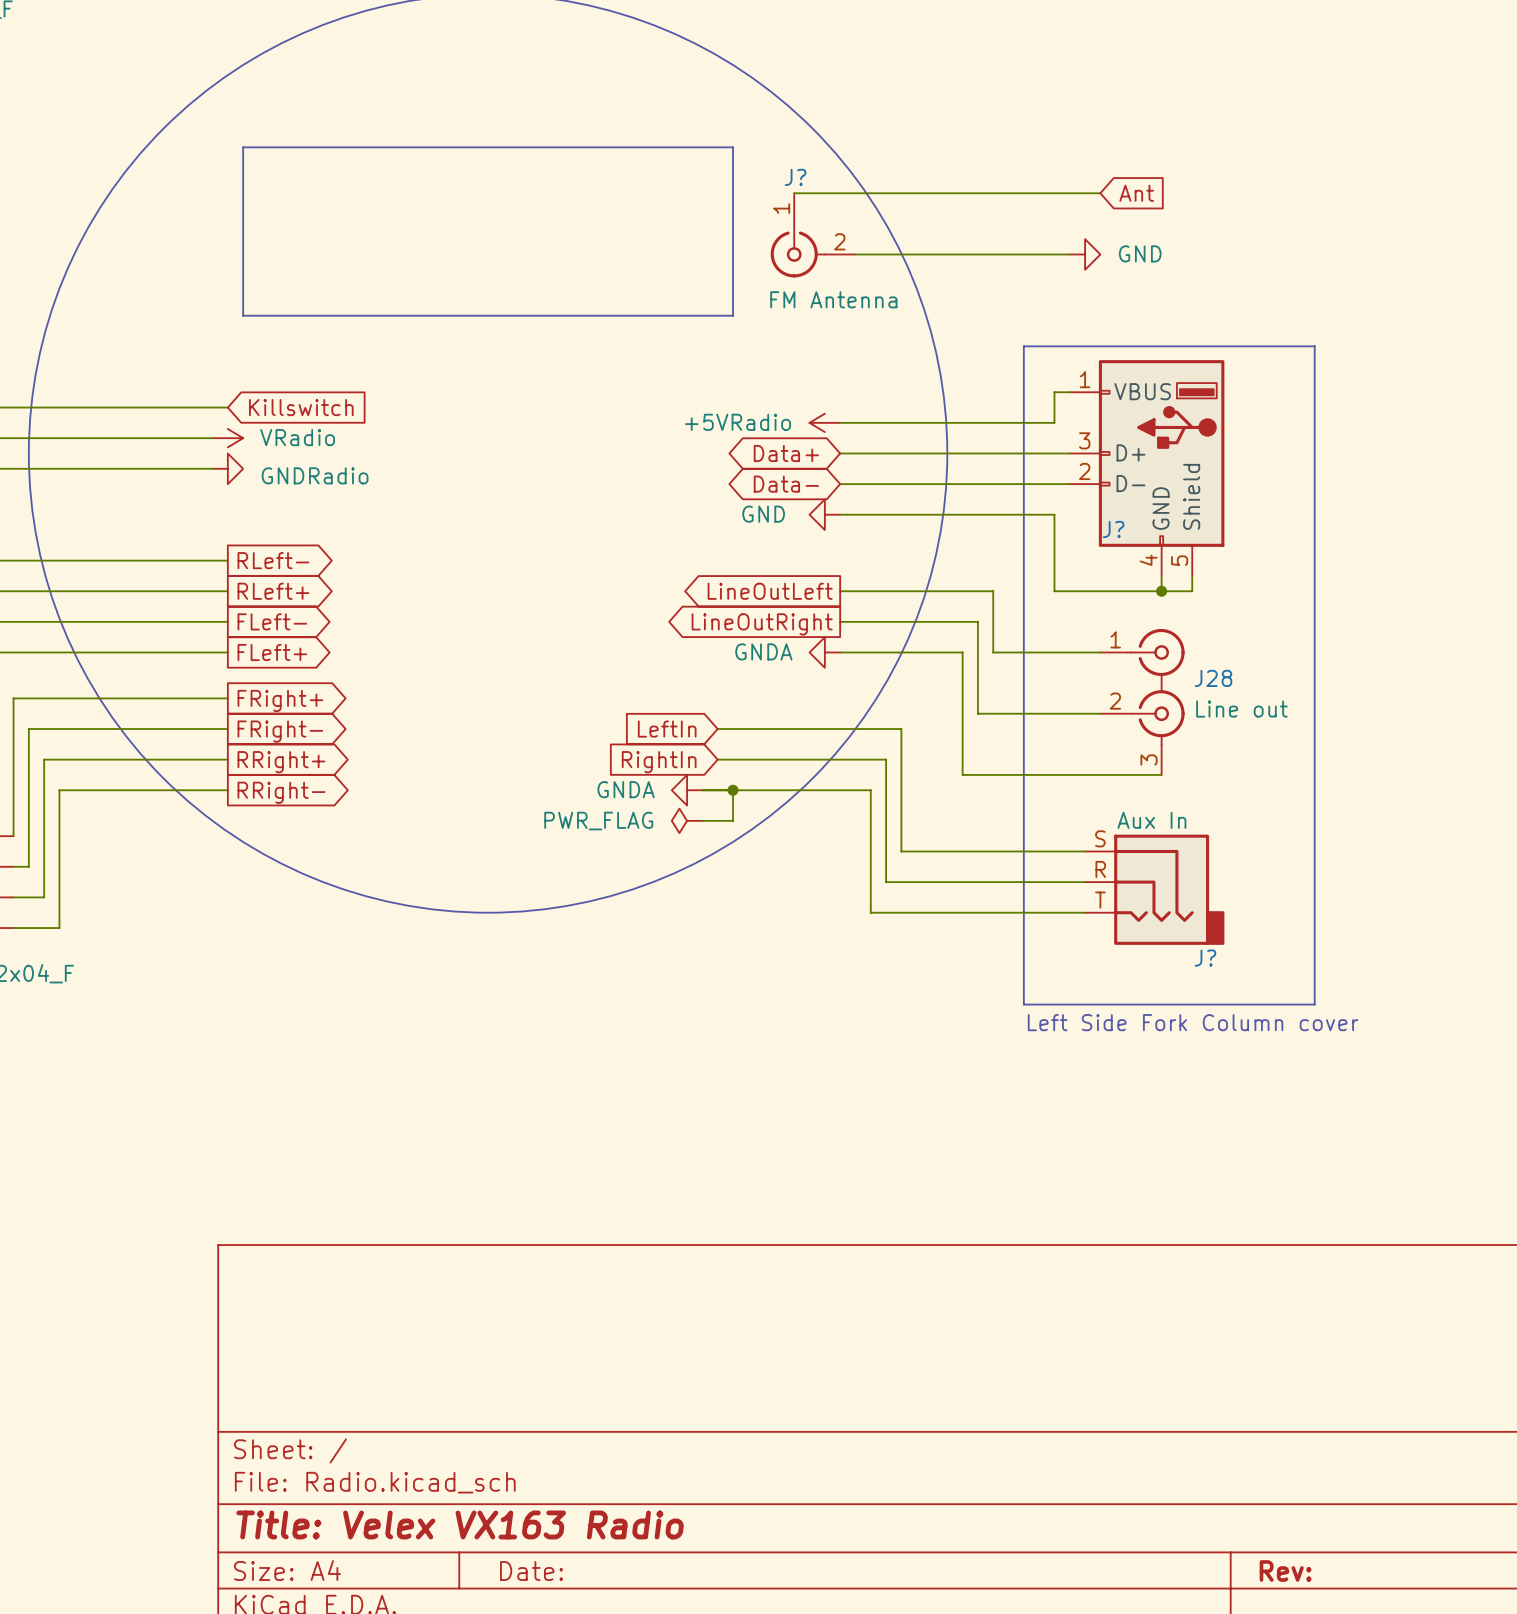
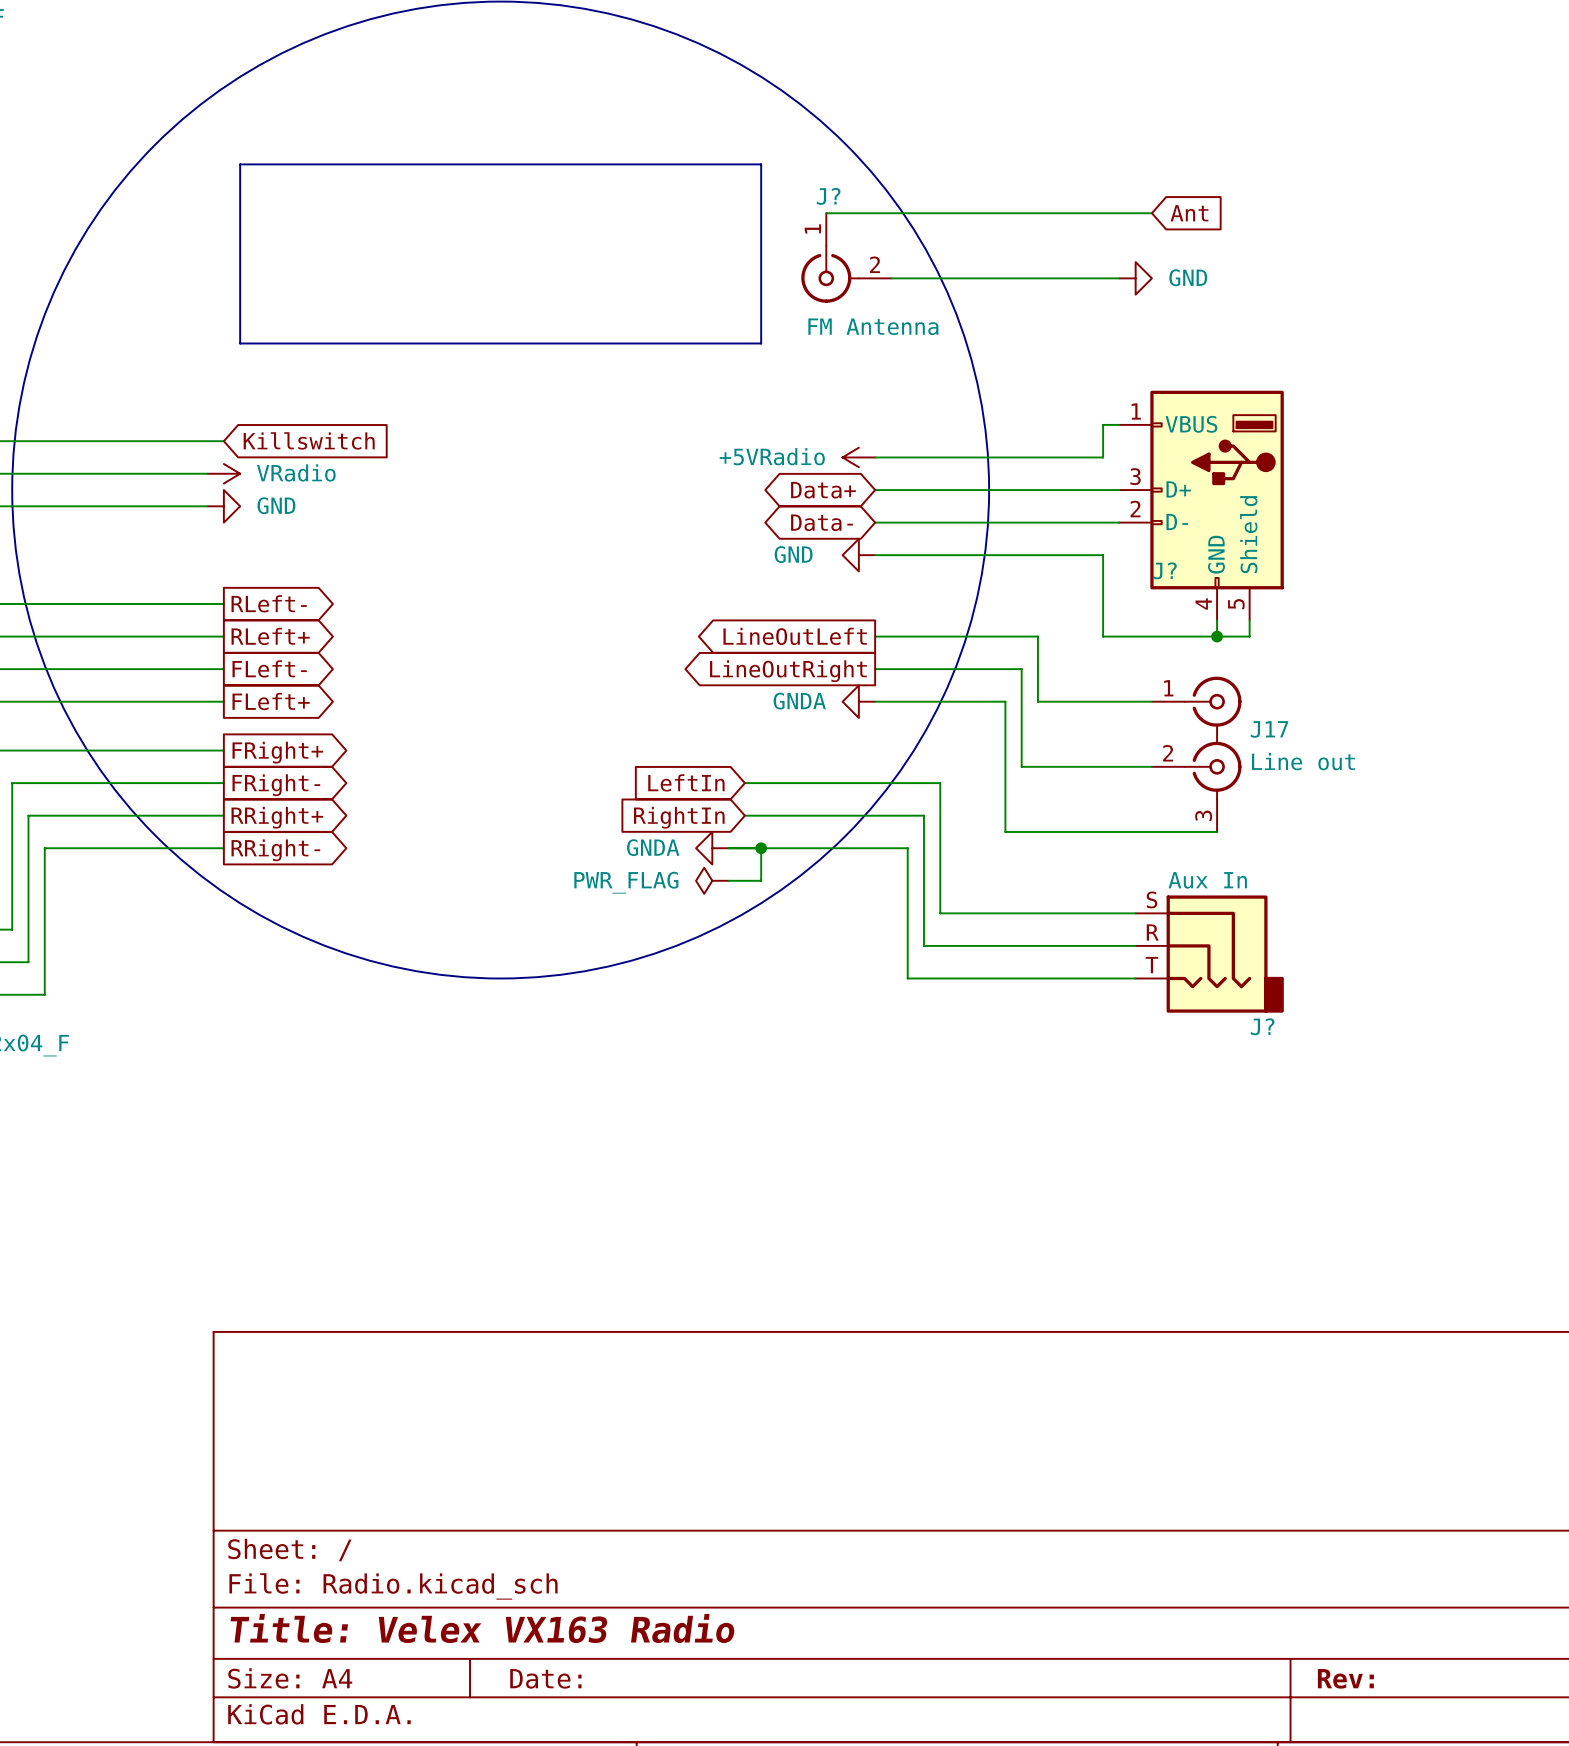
line: (1023, 346) (1314, 346) (1314, 1004) (1023, 1004) (1023, 346) -> none
power symbol: GNDRadio (227, 468) -> GND (223, 506)
J28 name: J28 (1213, 678) -> J17 (1269, 729)
text: Left Side Fork Column cover (1193, 1022) -> none

